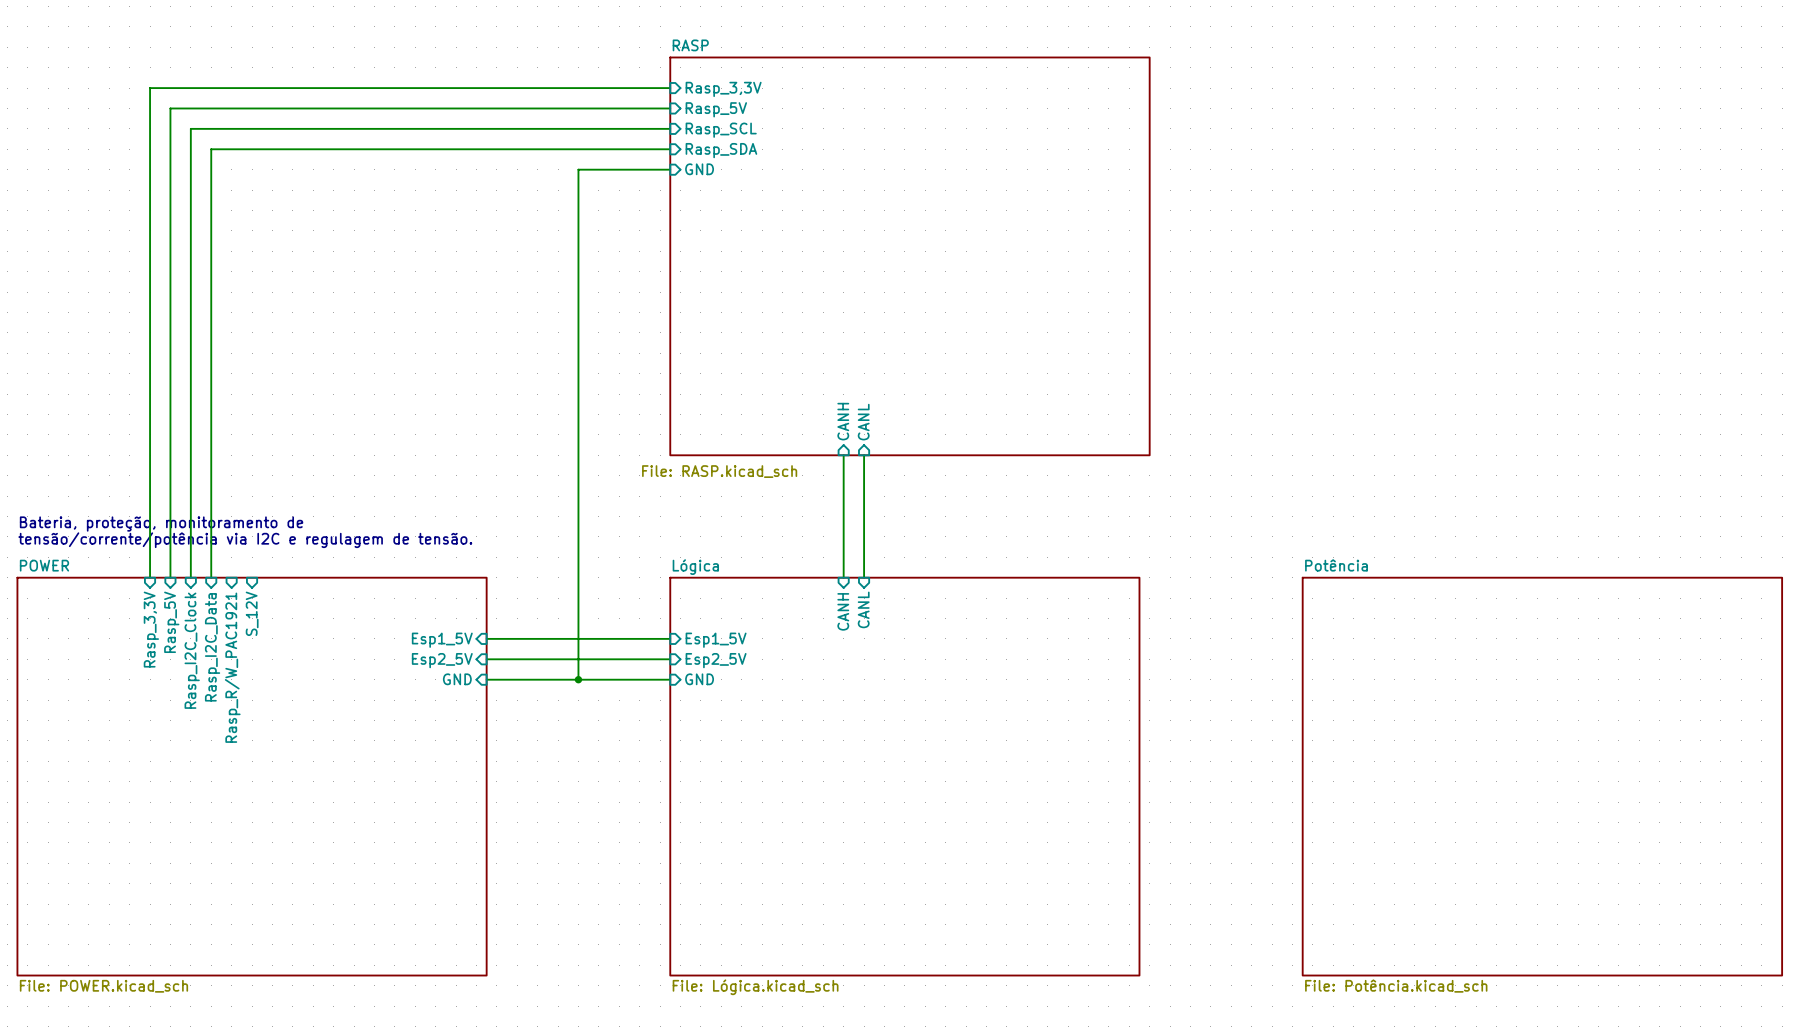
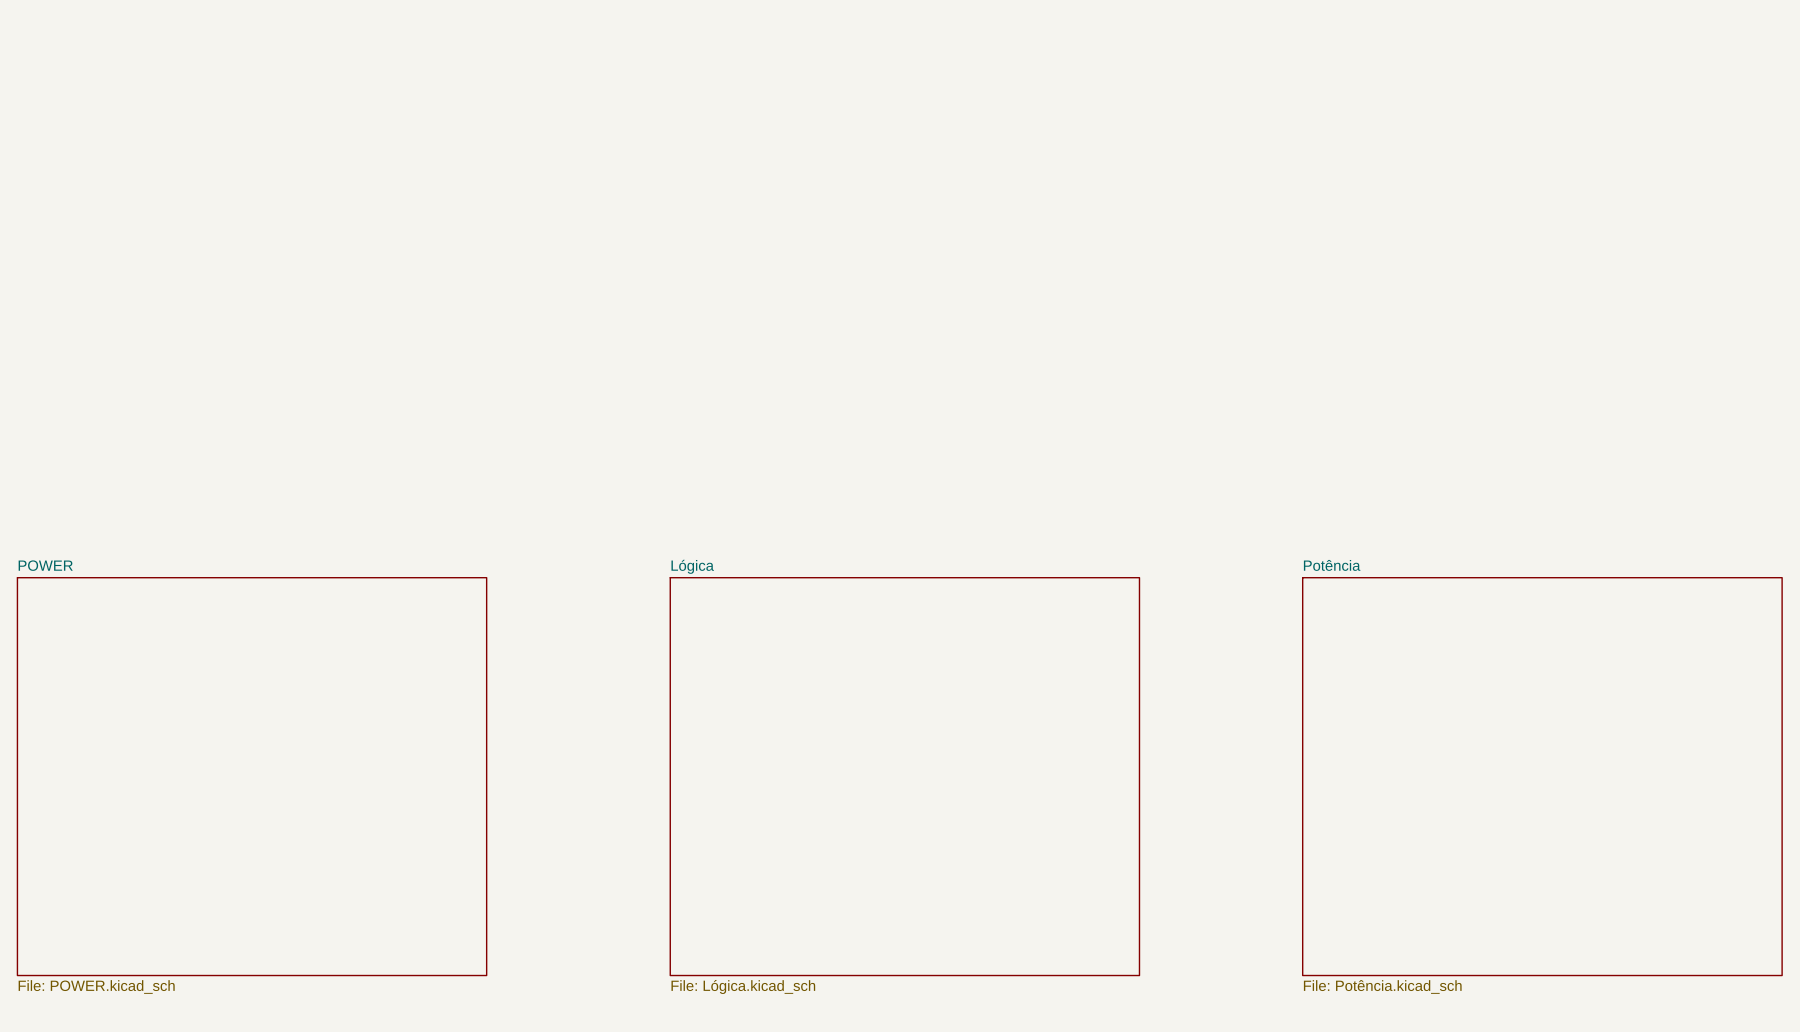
wire: (670, 88) (150, 88) (150, 577) -> none
sheet pin: Rasp_3,3V (723, 89) -> none
wire: (670, 108) (170, 108) (170, 577) -> none
sheet pin: Rasp_5V (716, 109) -> none
wire: (670, 128) (190, 128) (190, 577) -> none
sheet pin: Rasp_SCL (721, 130) -> none
wire: (670, 149) (211, 149) (211, 577) -> none
sheet pin: Rasp_SDA (721, 150) -> none
wire: (670, 169) (578, 169) (578, 679) -> none
sheet pin: GND (699, 169) -> none
sheet RASP: File: RASP.kicad_sch (909, 256) -> none
sheet pin: CANH (843, 421) -> none
sheet pin: CANL (863, 422) -> none
wire: (843, 455) (843, 577) -> none
wire: (864, 455) (864, 577) -> none
text: Bateria, proteção, monitoramento de (161, 524) -> none
text: tensão/corrente/potência via I2C e regulagem de tensão. (245, 540) -> none
sheet pin: CANL (863, 609) -> none
sheet pin: CANH (843, 611) -> none
sheet pin: S_12V (252, 613) -> none
sheet pin: Rasp_5V (171, 622) -> none
sheet pin: Rasp_3,3V (151, 629) -> none
wire: (486, 638) (670, 638) -> none
sheet pin: Esp1_5V (442, 640) -> none
sheet pin: Esp1_5V (716, 640) -> none
sheet pin: Rasp_I2C_Data (212, 647) -> none
sheet pin: Rasp_I2C_Clock (192, 650) -> none
wire: (486, 659) (670, 659) -> none
sheet pin: Esp2_5V (442, 660) -> none
sheet pin: Esp2_5V (716, 660) -> none
sheet pin: Rasp_R/W_PAC1921 (232, 667) -> none
sheet pin: GND (457, 679) -> none
wire: (486, 679) (670, 679) -> none
junction: (578, 679) -> none
sheet pin: GND (699, 679) -> none

